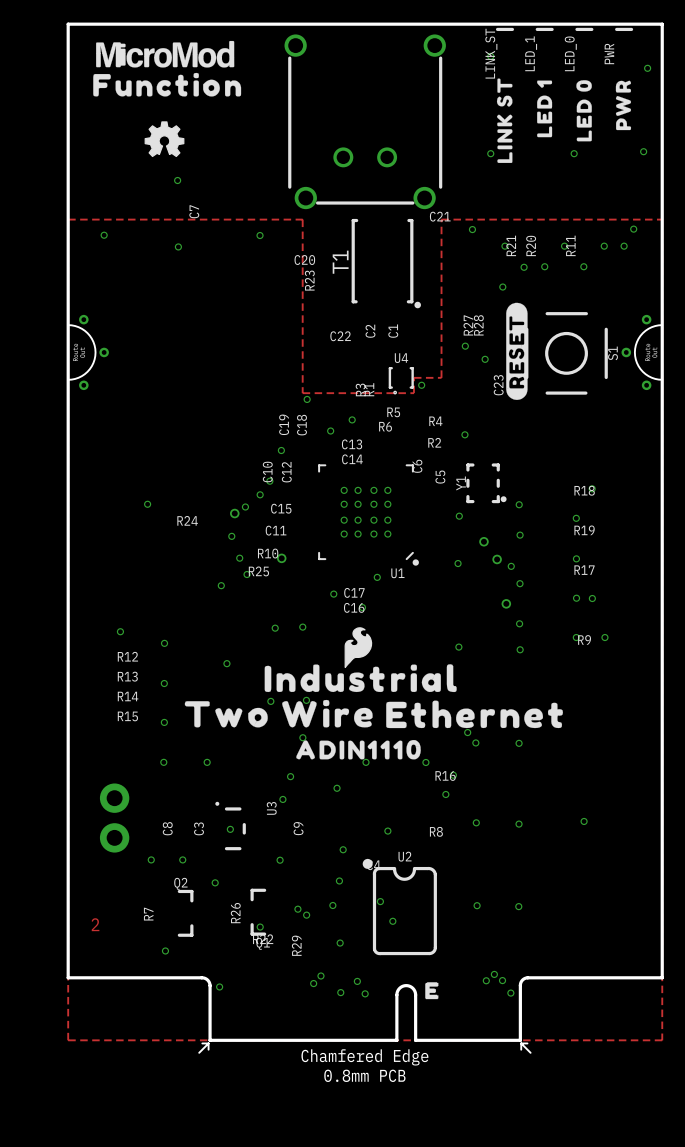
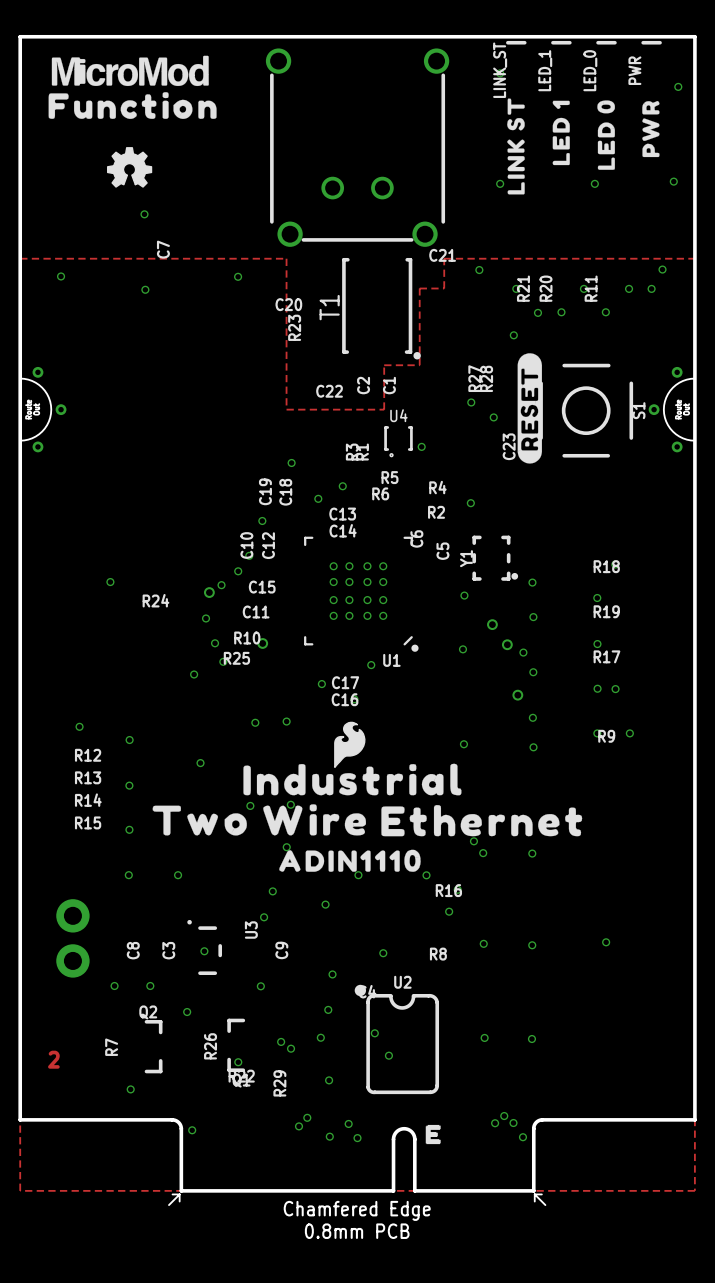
zone outline: (441, 245) (441, 377) (413, 377) (413, 393) (302, 393) (302, 352) -> (444, 288) (419, 288) (419, 365) (384, 365) (384, 409) (286, 409)

